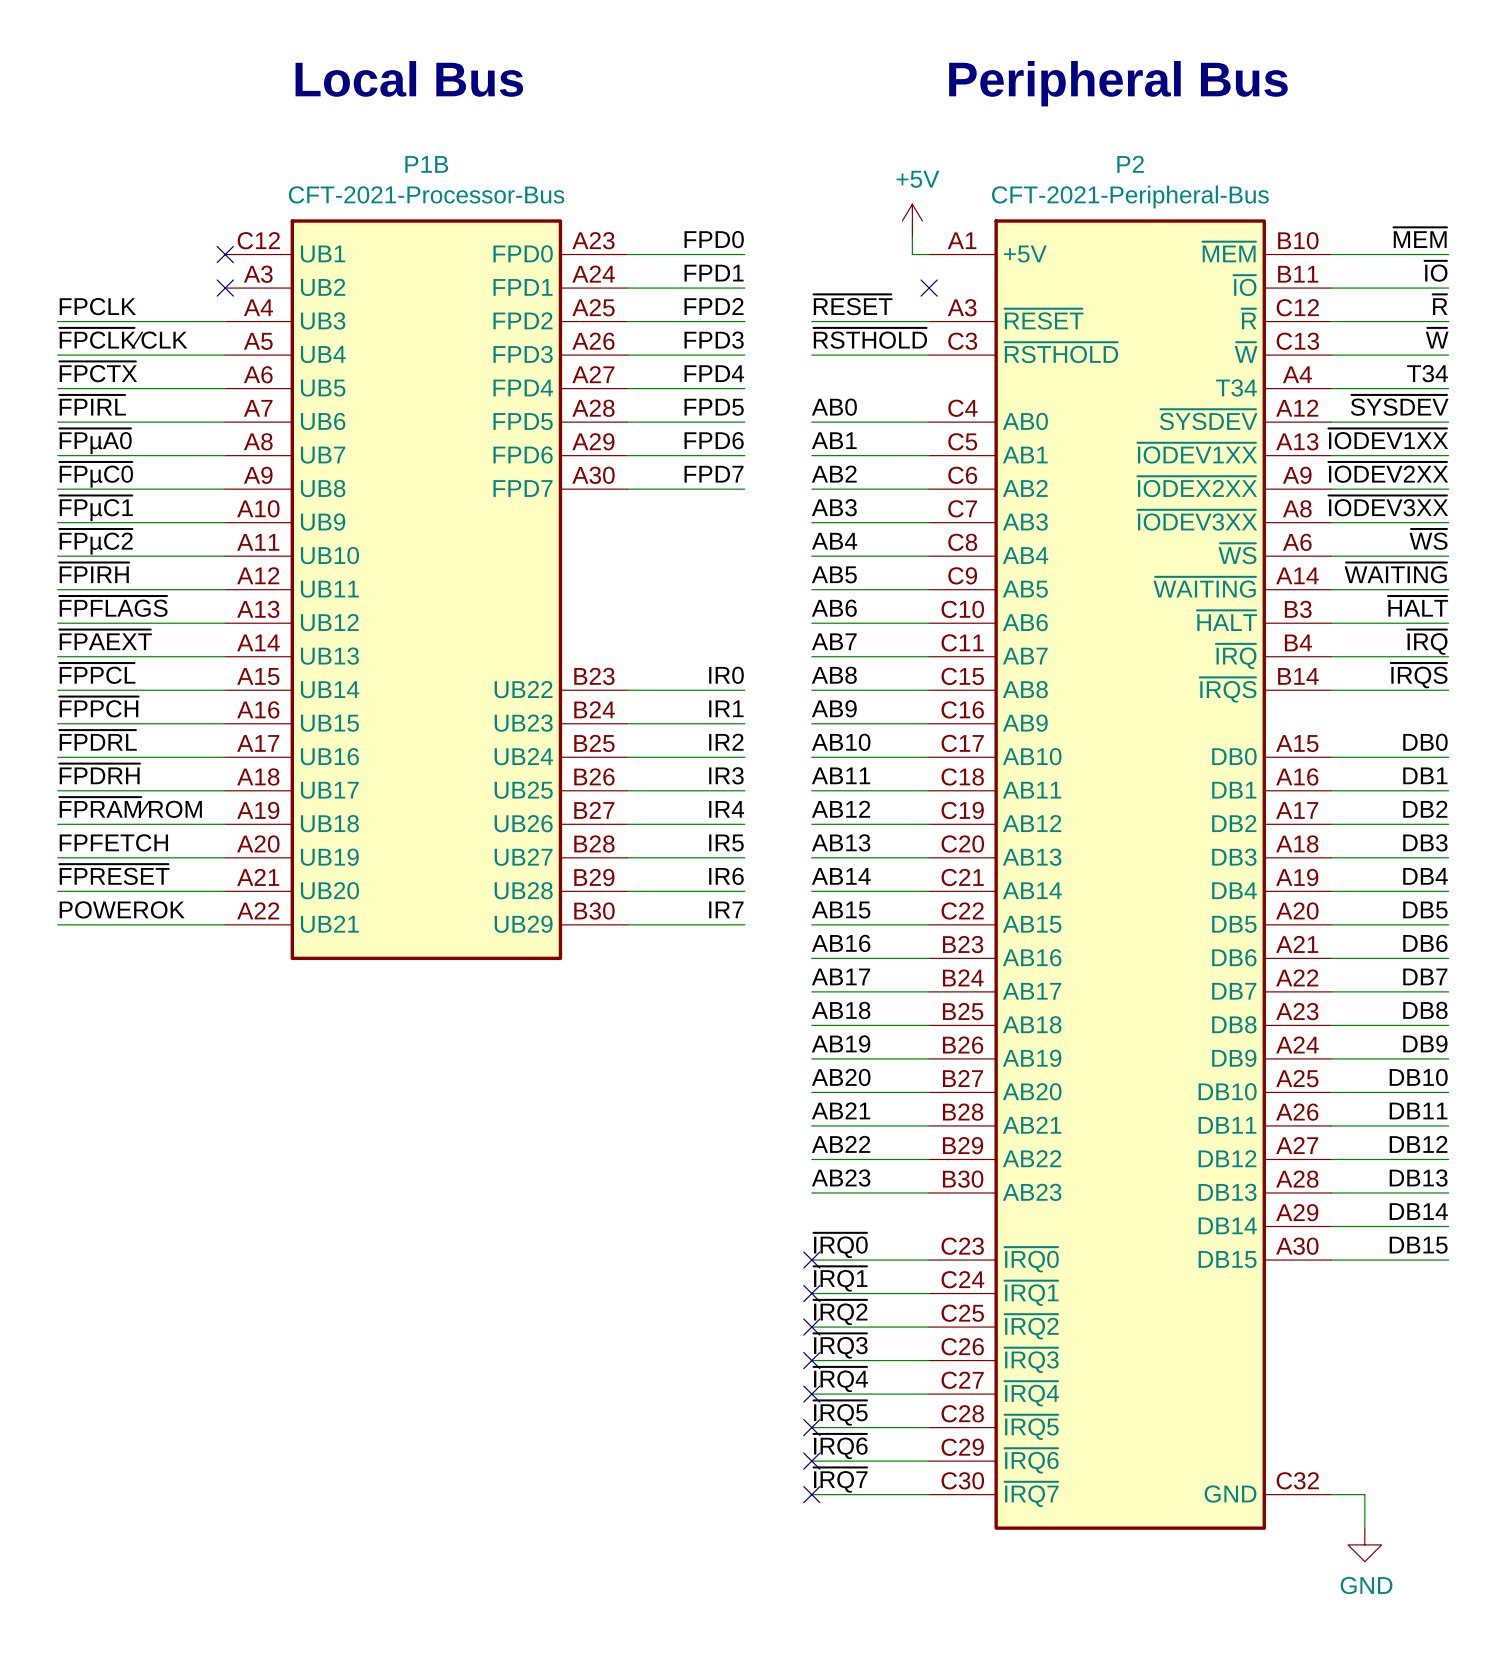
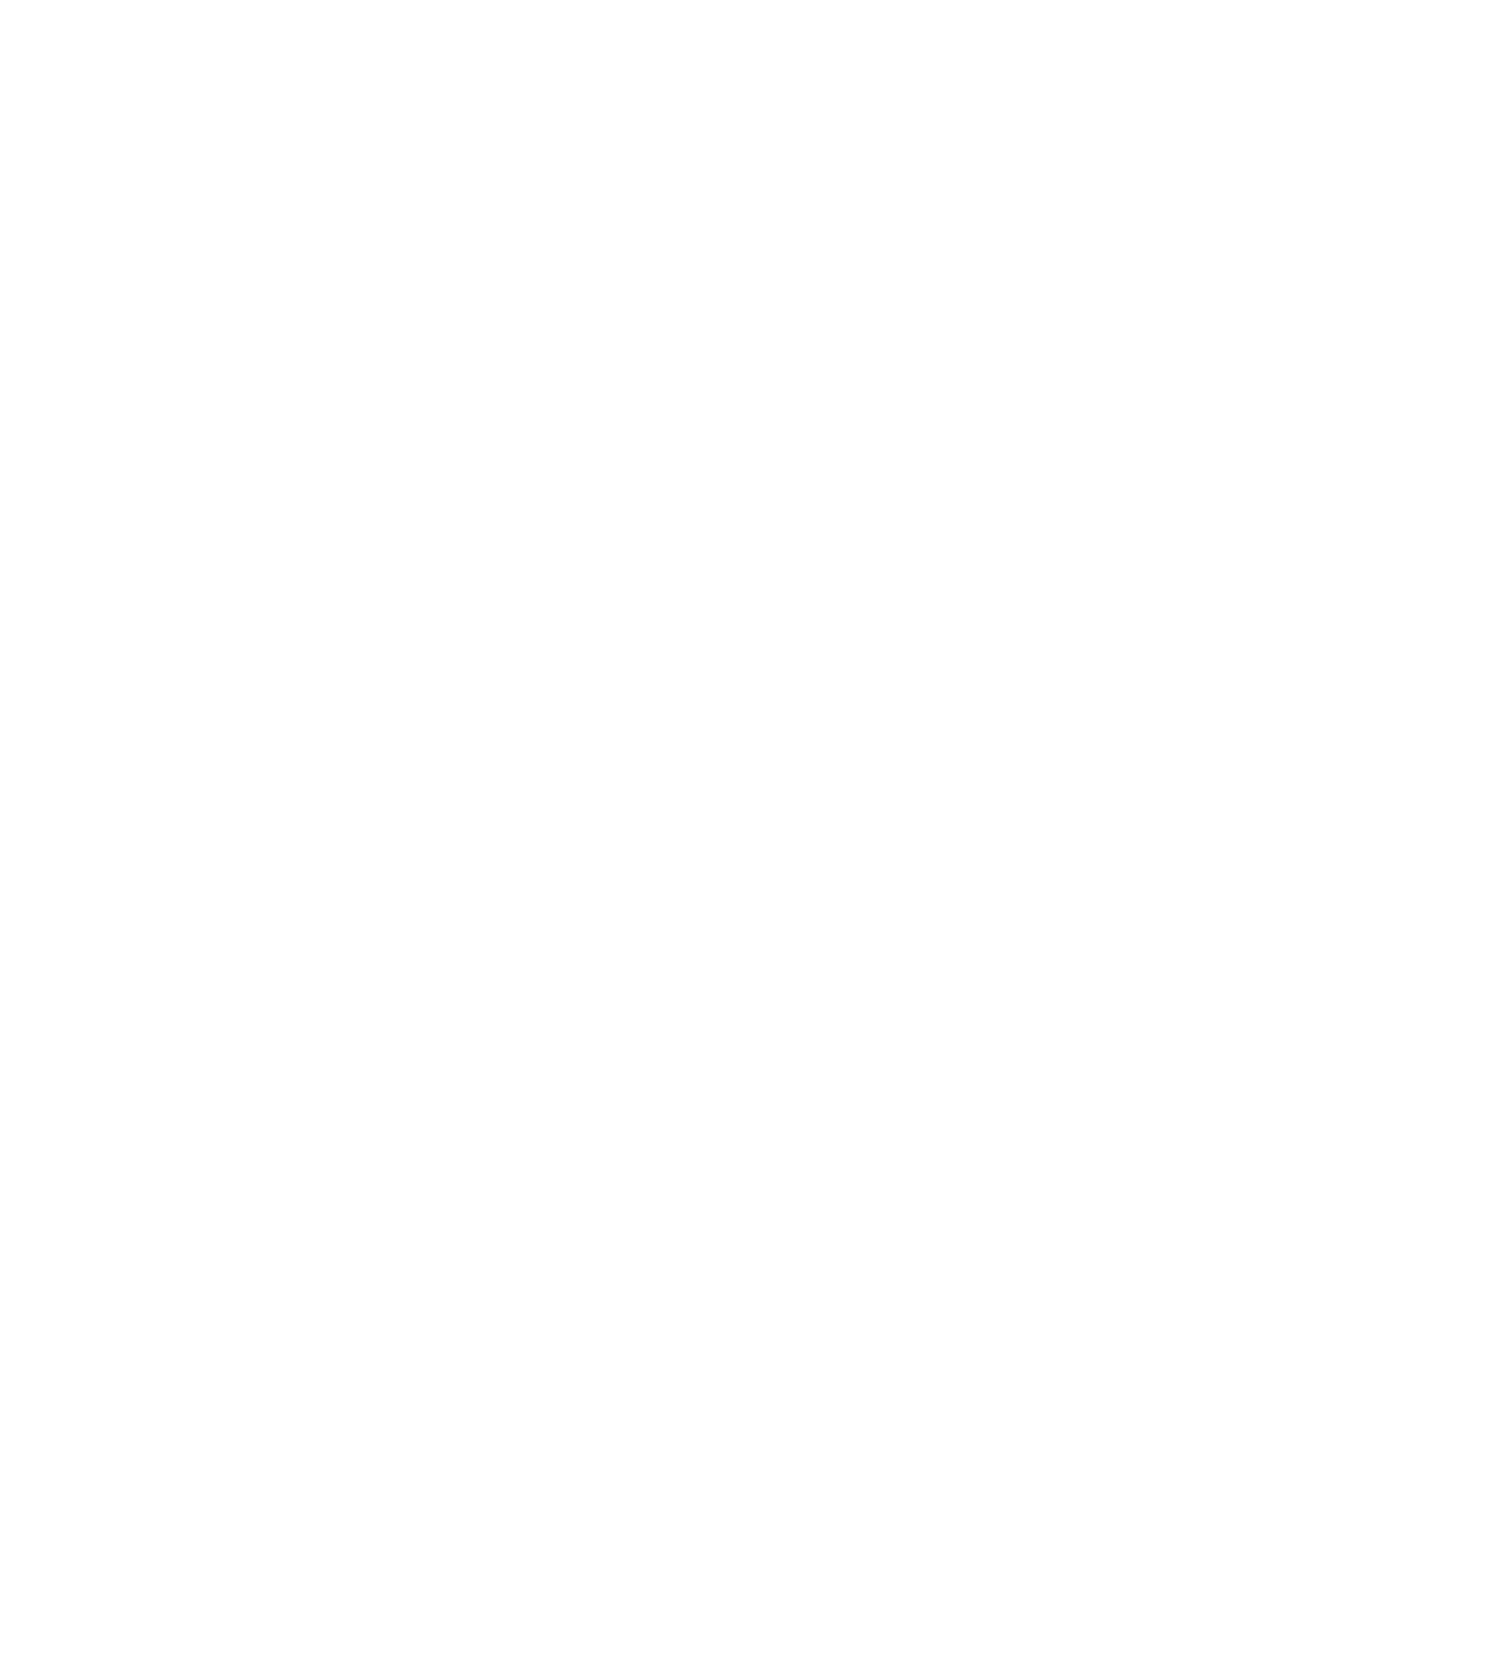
text: Local Bus (409, 78) -> none
text: Peripheral Bus (1118, 83) -> none
power symbol: +5V (912, 221) -> none
wire: (912, 237) (912, 254) (929, 254) -> none
label: ~{MEM} (1420, 237) -> none
label: FPD0 (714, 239) -> none
no-connect mark: (225, 254) -> none
wire: (627, 254) (744, 254) -> none
wire: (1331, 254) (1448, 254) -> none
label: ~{IO} (1436, 271) -> none
label: FPD1 (714, 273) -> none
no-connect mark: (225, 288) -> none
wire: (627, 288) (744, 288) -> none
no-connect mark: (929, 288) -> none
wire: (1331, 288) (1448, 288) -> none
label: ~{RESET} (852, 304) -> none
label: ~{R} (1440, 304) -> none
label: FPCLK (97, 306) -> none
label: FPD2 (714, 306) -> none
wire: (57, 321) (225, 321) -> none
wire: (627, 321) (744, 321) -> none
wire: (811, 321) (929, 321) -> none
wire: (1331, 321) (1448, 321) -> none
label: ~{FPCLK}⁄CLK (123, 338) -> none
label: ~{RSTHOLD} (870, 338) -> none
label: ~{W} (1437, 338) -> none
label: FPD3 (714, 340) -> none
wire: (57, 355) (225, 355) -> none
wire: (627, 355) (744, 355) -> none
wire: (811, 355) (929, 355) -> none
wire: (1331, 355) (1448, 355) -> none
label: ~{FPCTX} (98, 371) -> none
label: FPD4 (714, 373) -> none
label: T34 (1427, 373) -> none
wire: (57, 388) (225, 388) -> none
wire: (627, 388) (744, 388) -> none
wire: (1331, 388) (1448, 388) -> none
label: ~{FPIRL} (92, 405) -> none
label: ~{SYSDEV} (1399, 405) -> none
label: FPD5 (714, 407) -> none
label: AB0 (834, 407) -> none
wire: (57, 422) (225, 422) -> none
wire: (627, 422) (744, 422) -> none
wire: (811, 422) (929, 422) -> none
wire: (1331, 422) (1448, 422) -> none
label: ~{IODEV1XX} (1388, 438) -> none
label: FPD6 (714, 440) -> none
label: AB1 (834, 440) -> none
label: ~{FPµA0} (95, 441) -> none
wire: (57, 455) (225, 455) -> none
wire: (627, 455) (744, 455) -> none
wire: (811, 455) (929, 455) -> none
wire: (1331, 455) (1448, 455) -> none
label: ~{IODEV2XX} (1388, 472) -> none
label: ~{FPµC0} (96, 474) -> none
label: FPD7 (714, 474) -> none
label: AB2 (834, 474) -> none
wire: (57, 489) (225, 489) -> none
wire: (627, 489) (744, 489) -> none
wire: (811, 489) (929, 489) -> none
wire: (1331, 489) (1448, 489) -> none
label: ~{IODEV3XX} (1388, 505) -> none
label: AB3 (834, 507) -> none
label: ~{FPµC1} (96, 508) -> none
wire: (57, 522) (225, 522) -> none
wire: (811, 522) (929, 522) -> none
wire: (1331, 522) (1448, 522) -> none
label: ~{WS} (1428, 539) -> none
label: ~{FPµC2} (96, 541) -> none
label: AB4 (834, 541) -> none
wire: (57, 556) (225, 556) -> none
wire: (811, 556) (929, 556) -> none
wire: (1331, 556) (1448, 556) -> none
label: ~{FPIRH} (94, 572) -> none
label: ~{WAITING} (1395, 572) -> none
label: AB5 (834, 574) -> none
wire: (57, 589) (225, 589) -> none
P1B: CFT-2021-Processor-Bus (426, 589) -> none
wire: (811, 589) (929, 589) -> none
wire: (1331, 589) (1448, 589) -> none
label: ~{FPFLAGS} (113, 606) -> none
label: ~{HALT} (1418, 606) -> none
label: AB6 (834, 608) -> none
wire: (57, 623) (225, 623) -> none
wire: (811, 623) (929, 623) -> none
wire: (1331, 623) (1448, 623) -> none
label: ~{FPAEXT} (105, 639) -> none
label: AB7 (834, 641) -> none
label: ~{IRQ} (1427, 642) -> none
wire: (57, 656) (225, 656) -> none
wire: (811, 656) (929, 656) -> none
wire: (1331, 656) (1448, 656) -> none
label: ~{FPPCL} (97, 673) -> none
label: IR0 (726, 675) -> none
label: AB8 (834, 675) -> none
label: ~{IRQS} (1419, 675) -> none
wire: (57, 690) (225, 690) -> none
wire: (627, 690) (744, 690) -> none
wire: (811, 690) (929, 690) -> none
wire: (1331, 690) (1448, 690) -> none
label: ~{FPPCH} (98, 707) -> none
label: IR1 (726, 708) -> none
label: AB9 (834, 708) -> none
wire: (57, 723) (225, 723) -> none
wire: (627, 723) (744, 723) -> none
wire: (811, 723) (929, 723) -> none
label: ~{FPDRL} (98, 740) -> none
label: IR2 (726, 742) -> none
label: AB10 (841, 742) -> none
label: DB0 (1425, 742) -> none
wire: (57, 757) (225, 757) -> none
wire: (627, 757) (744, 757) -> none
wire: (811, 757) (929, 757) -> none
wire: (1331, 757) (1448, 757) -> none
label: ~{FPDRH} (99, 773) -> none
label: IR3 (726, 775) -> none
label: AB11 (841, 775) -> none
label: DB1 (1425, 775) -> none
wire: (57, 790) (225, 790) -> none
wire: (627, 790) (744, 790) -> none
wire: (811, 790) (929, 790) -> none
wire: (1331, 790) (1448, 790) -> none
label: ~{FPRAM}∕ROM (130, 807) -> none
label: IR4 (726, 809) -> none
label: AB12 (841, 809) -> none
label: DB2 (1425, 809) -> none
wire: (57, 824) (225, 824) -> none
wire: (627, 824) (744, 824) -> none
wire: (811, 824) (929, 824) -> none
wire: (1331, 824) (1448, 824) -> none
label: FPFETCH (113, 842) -> none
label: IR5 (726, 842) -> none
label: AB13 (841, 842) -> none
label: DB3 (1425, 842) -> none
wire: (57, 857) (225, 857) -> none
wire: (627, 857) (744, 857) -> none
wire: (811, 857) (929, 857) -> none
wire: (1331, 857) (1448, 857) -> none
label: ~{FPRESET} (114, 874) -> none
P2: CFT-2021-Peripheral-Bus (1130, 874) -> none
label: IR6 (726, 876) -> none
label: AB14 (841, 876) -> none
label: DB4 (1425, 876) -> none
wire: (57, 891) (225, 891) -> none
wire: (627, 891) (744, 891) -> none
wire: (811, 891) (929, 891) -> none
wire: (1331, 891) (1448, 891) -> none
label: POWEROK (122, 909) -> none
label: IR7 (726, 909) -> none
label: AB15 (841, 910) -> none
label: DB5 (1425, 910) -> none
wire: (57, 924) (225, 924) -> none
wire: (627, 924) (744, 924) -> none
wire: (811, 924) (929, 924) -> none
wire: (1331, 924) (1448, 924) -> none
label: AB16 (841, 943) -> none
label: DB6 (1425, 943) -> none
wire: (811, 958) (929, 958) -> none
wire: (1331, 958) (1448, 958) -> none
label: AB17 (841, 976) -> none
label: DB7 (1425, 976) -> none
wire: (811, 991) (929, 991) -> none
wire: (1331, 991) (1448, 991) -> none
label: AB18 (841, 1010) -> none
label: DB8 (1425, 1010) -> none
wire: (811, 1025) (929, 1025) -> none
wire: (1331, 1025) (1448, 1025) -> none
label: AB19 (841, 1043) -> none
label: DB9 (1425, 1043) -> none
wire: (811, 1058) (929, 1058) -> none
wire: (1331, 1058) (1448, 1058) -> none
label: AB20 (841, 1077) -> none
label: DB10 (1418, 1077) -> none
wire: (811, 1092) (929, 1092) -> none
wire: (1331, 1092) (1448, 1092) -> none
label: AB21 (841, 1110) -> none
label: DB11 (1418, 1111) -> none
wire: (811, 1125) (929, 1125) -> none
wire: (1331, 1125) (1448, 1125) -> none
label: AB22 (841, 1144) -> none
label: DB12 (1418, 1144) -> none
wire: (811, 1159) (929, 1159) -> none
wire: (1331, 1159) (1448, 1159) -> none
label: AB23 (841, 1178) -> none
label: DB13 (1418, 1178) -> none
wire: (811, 1192) (929, 1192) -> none
wire: (1331, 1192) (1448, 1192) -> none
label: DB14 (1418, 1211) -> none
wire: (1331, 1226) (1448, 1226) -> none
label: ~{IRQ0} (840, 1245) -> none
label: DB15 (1418, 1245) -> none
wire: (811, 1260) (929, 1260) -> none
no-connect mark: (811, 1260) -> none
wire: (1331, 1260) (1448, 1260) -> none
label: ~{IRQ1} (840, 1278) -> none
wire: (811, 1293) (929, 1293) -> none
no-connect mark: (811, 1293) -> none
label: ~{IRQ2} (840, 1312) -> none
wire: (811, 1327) (929, 1327) -> none
no-connect mark: (811, 1327) -> none
label: ~{IRQ3} (840, 1345) -> none
wire: (811, 1360) (929, 1360) -> none
no-connect mark: (811, 1360) -> none
label: ~{IRQ4} (840, 1379) -> none
wire: (811, 1394) (929, 1394) -> none
no-connect mark: (811, 1394) -> none
label: ~{IRQ5} (840, 1413) -> none
wire: (811, 1427) (929, 1427) -> none
no-connect mark: (811, 1427) -> none
label: ~{IRQ6} (840, 1446) -> none
wire: (811, 1461) (929, 1461) -> none
no-connect mark: (811, 1461) -> none
label: ~{IRQ7} (840, 1480) -> none
wire: (811, 1494) (929, 1494) -> none
no-connect mark: (811, 1494) -> none
wire: (1331, 1494) (1364, 1494) (1364, 1528) -> none
power symbol: GND (1364, 1544) -> none

